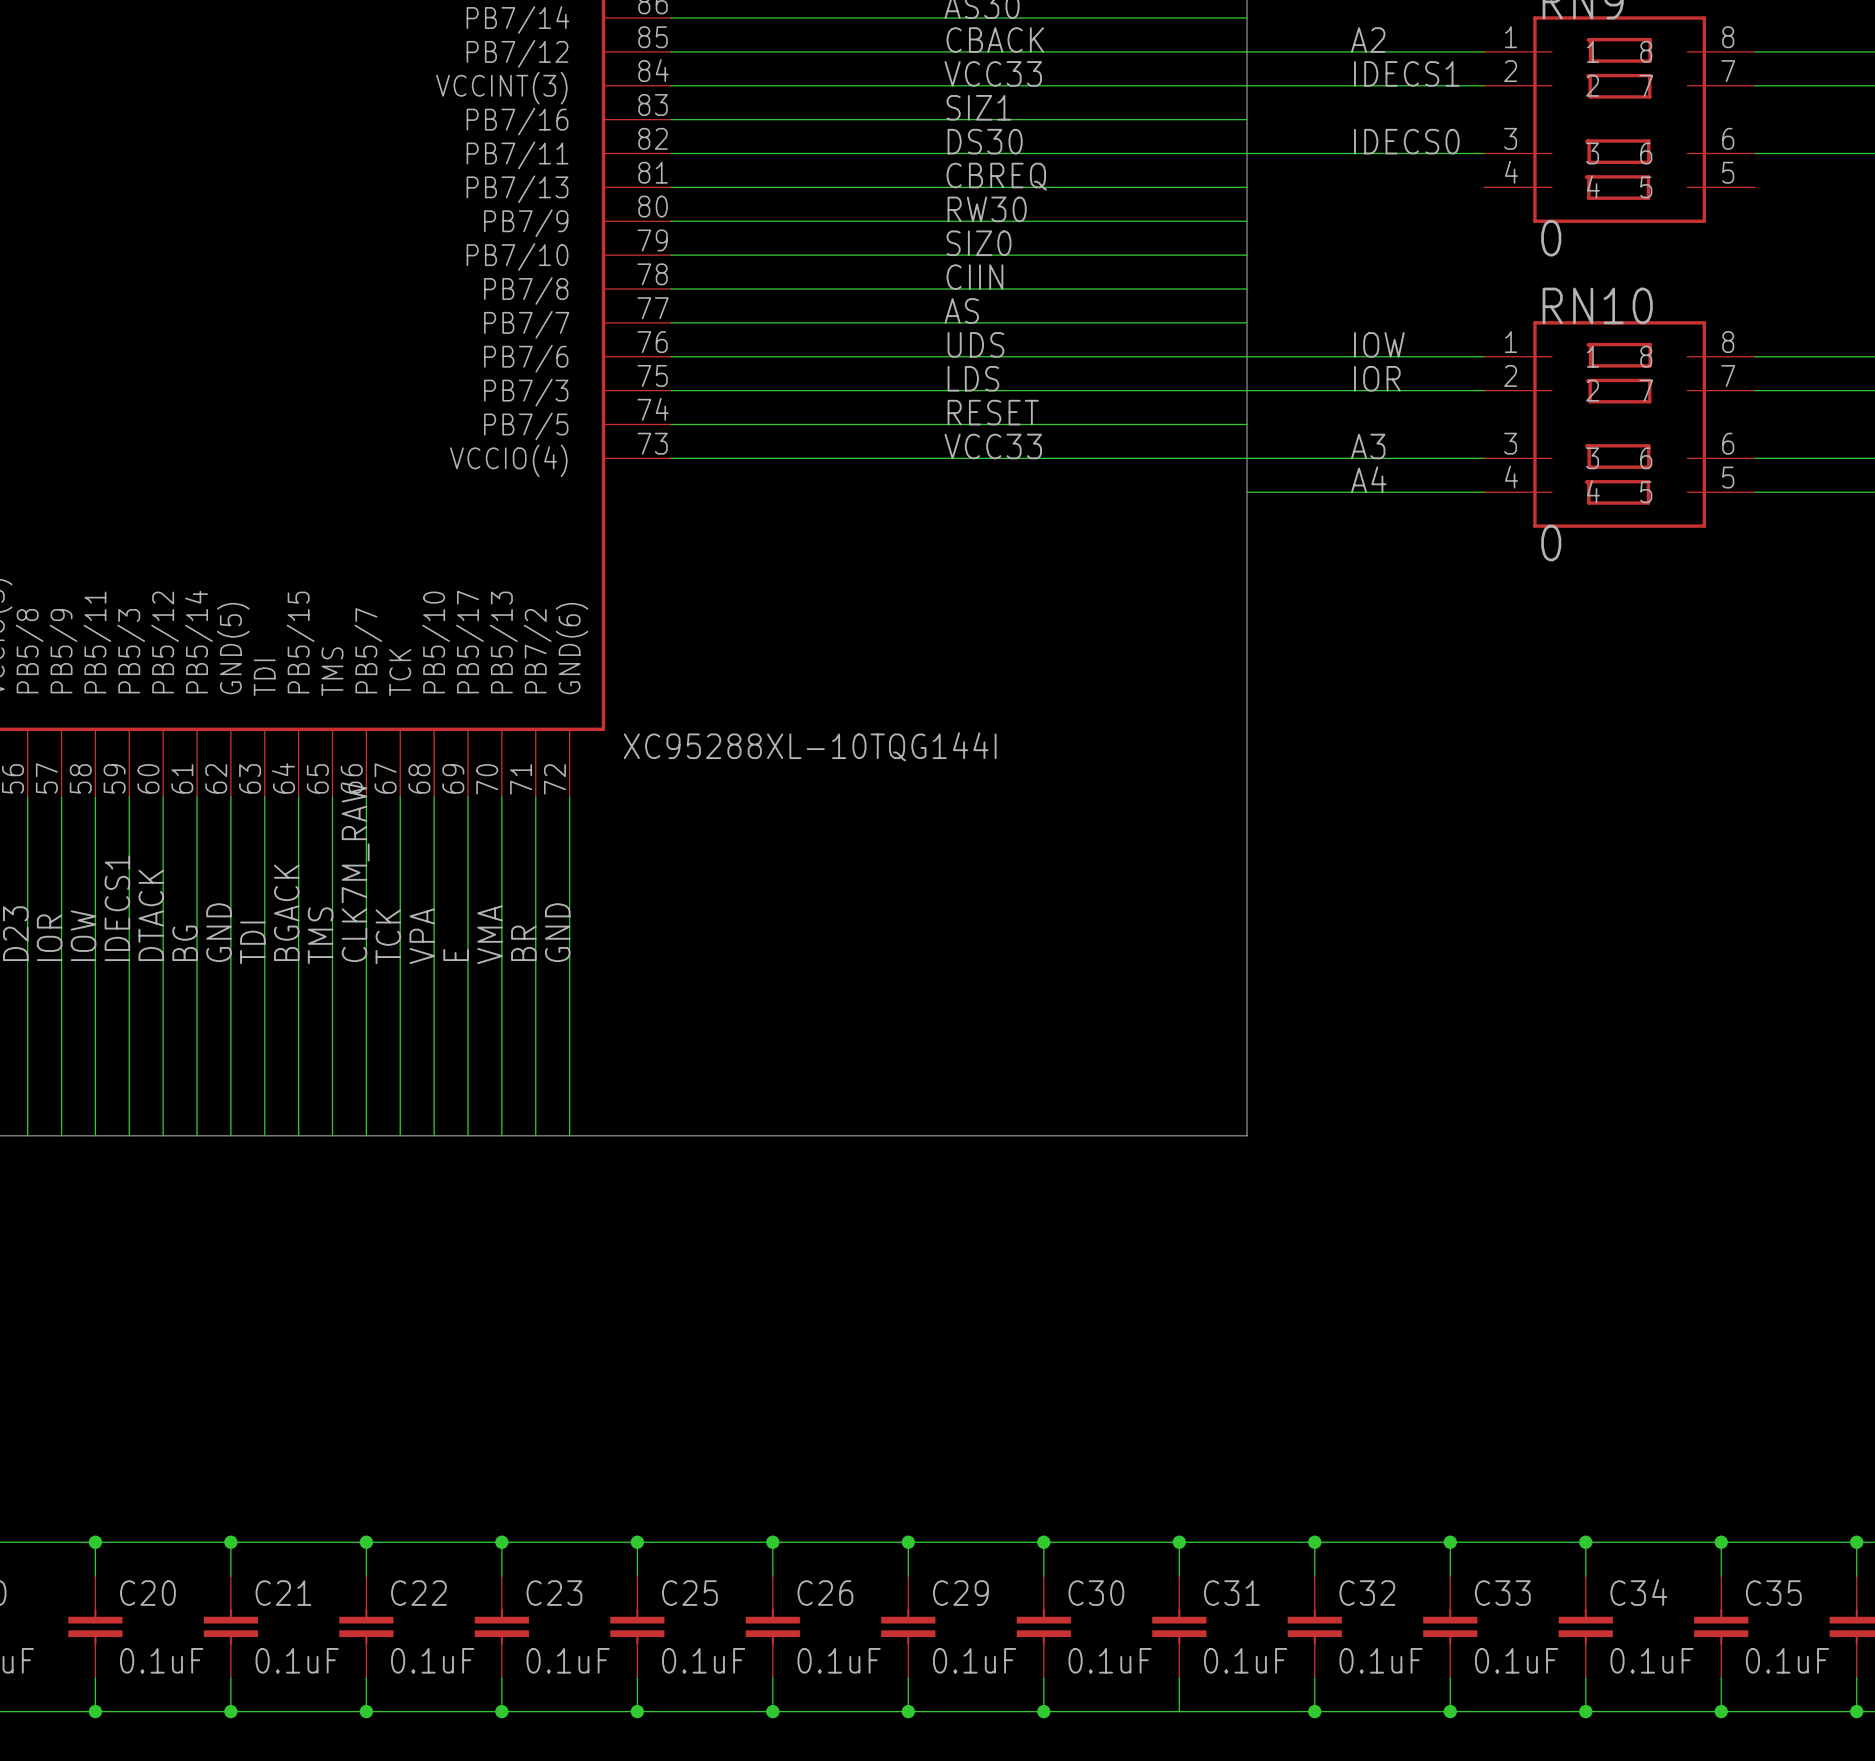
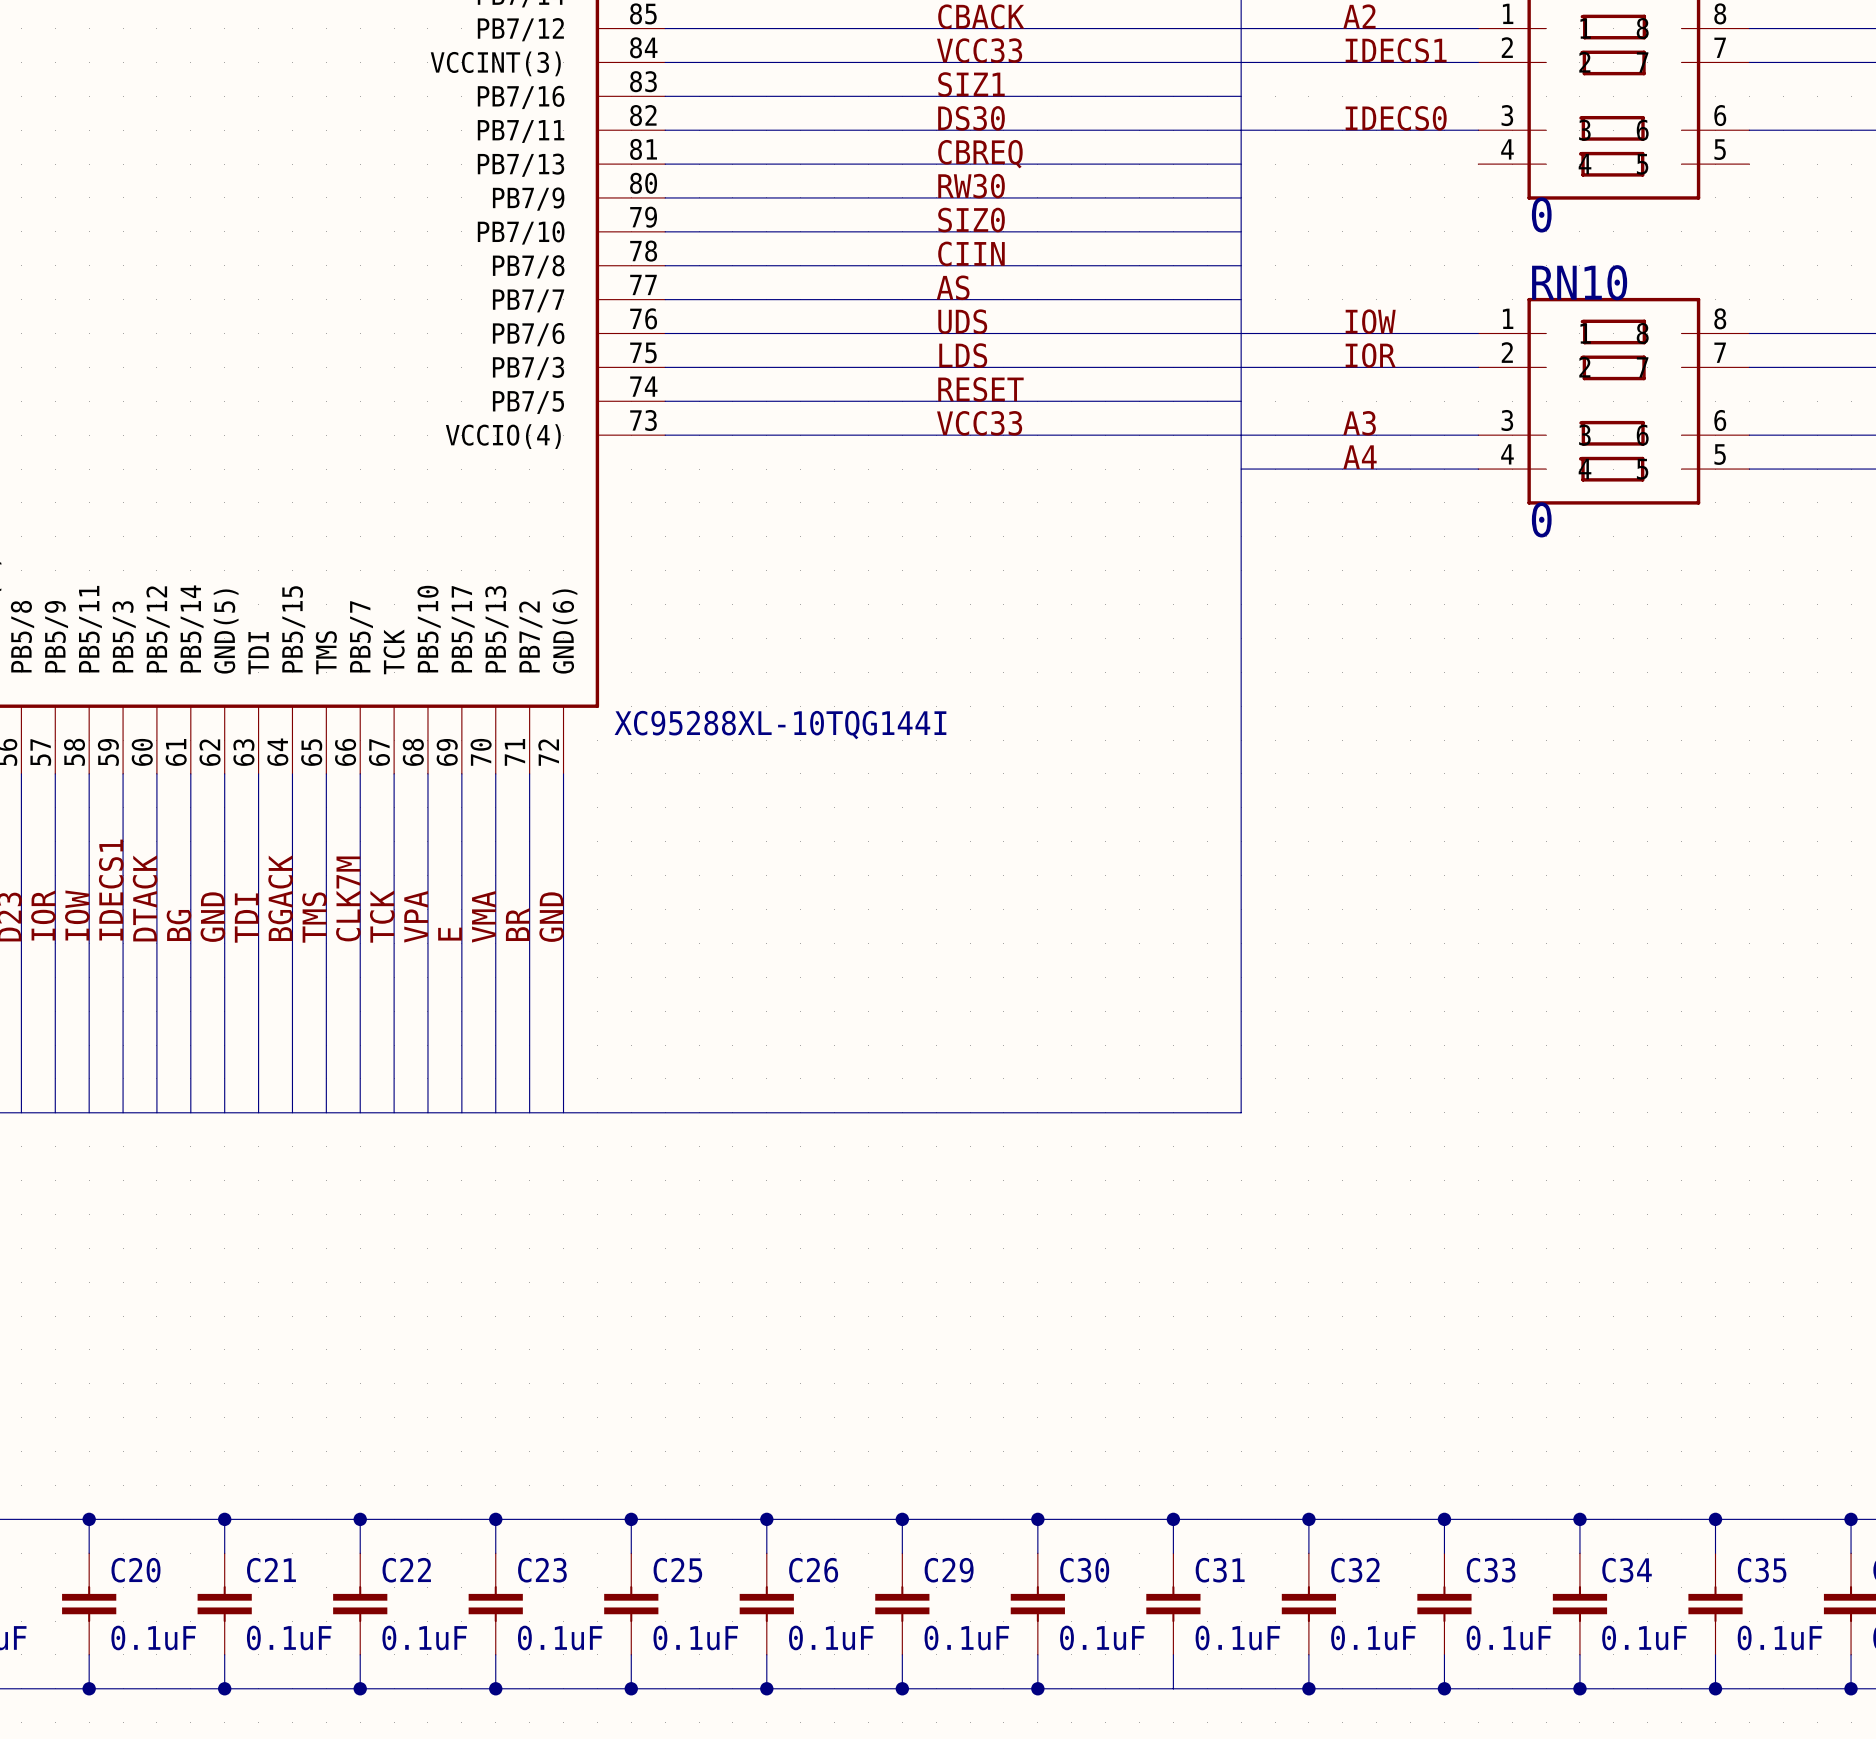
label: CLK7M_RAW (355, 872) -> CLK7M (348, 898)

